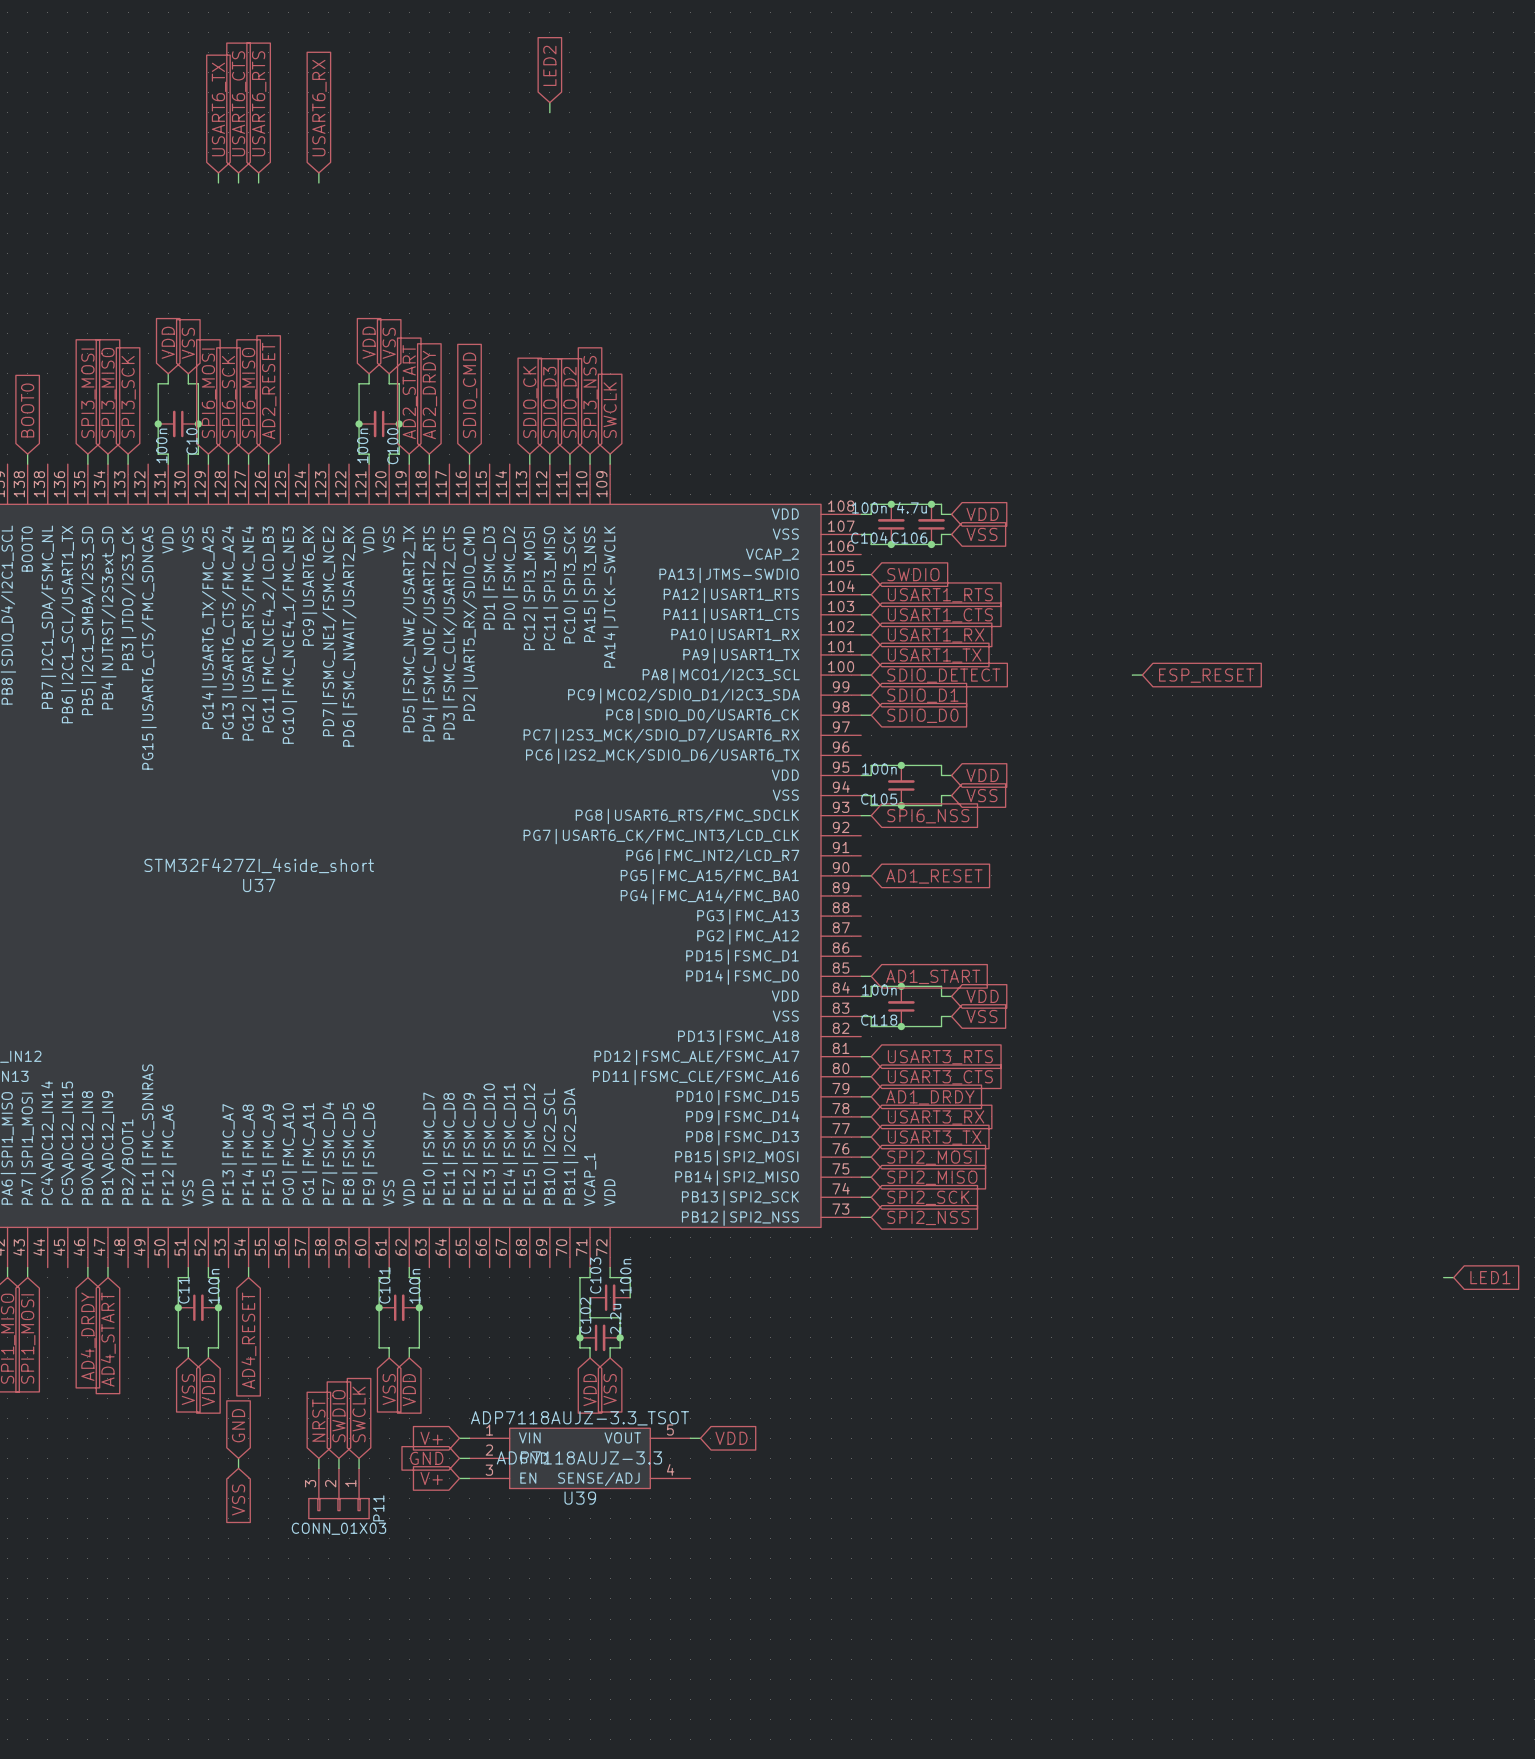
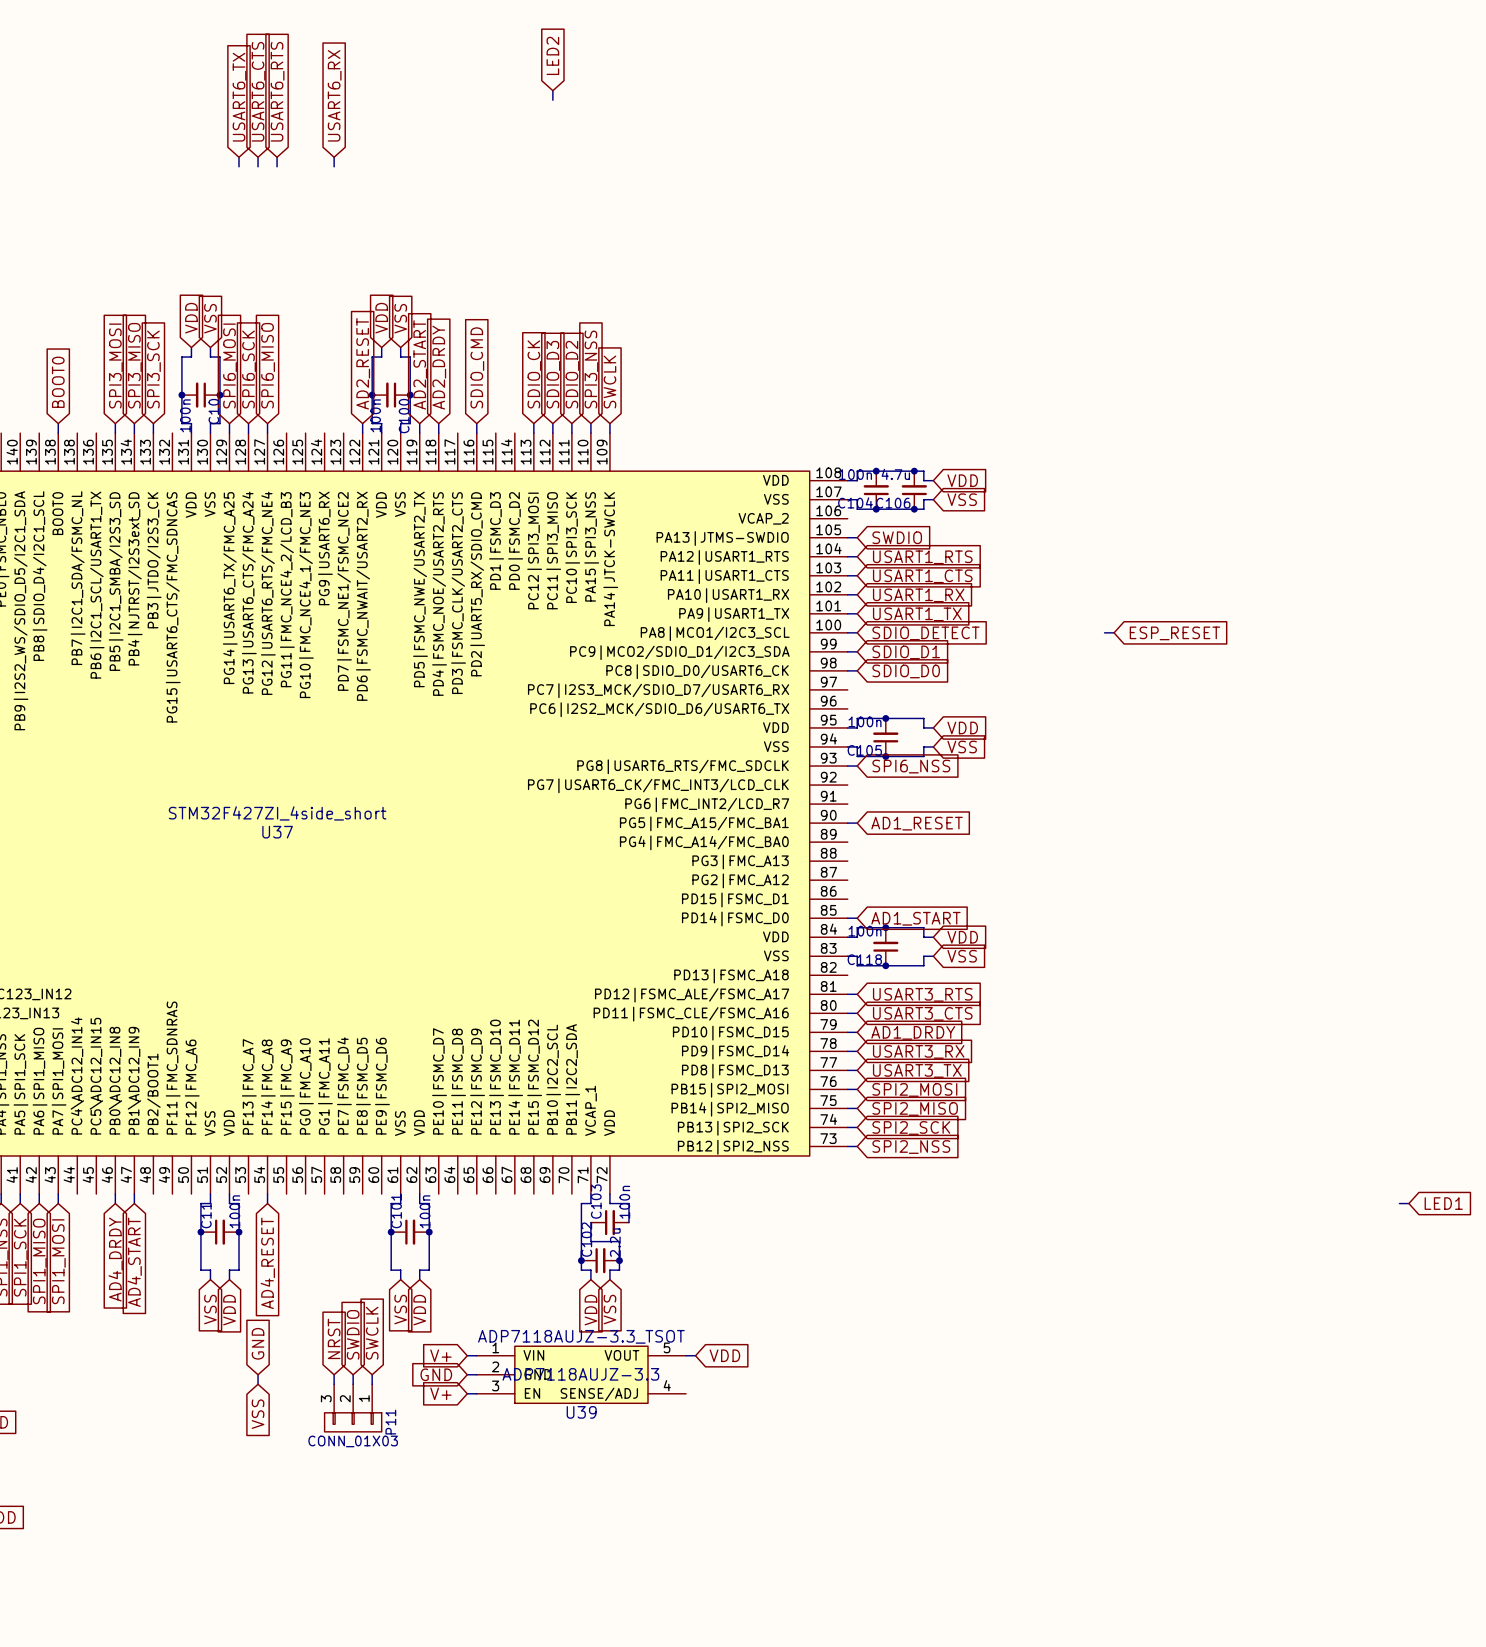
global label position: AD2_RESET (269, 390) -> AD2_RESET (363, 363)
wire: (268, 454) (268, 464) -> (362, 423) (362, 433)

